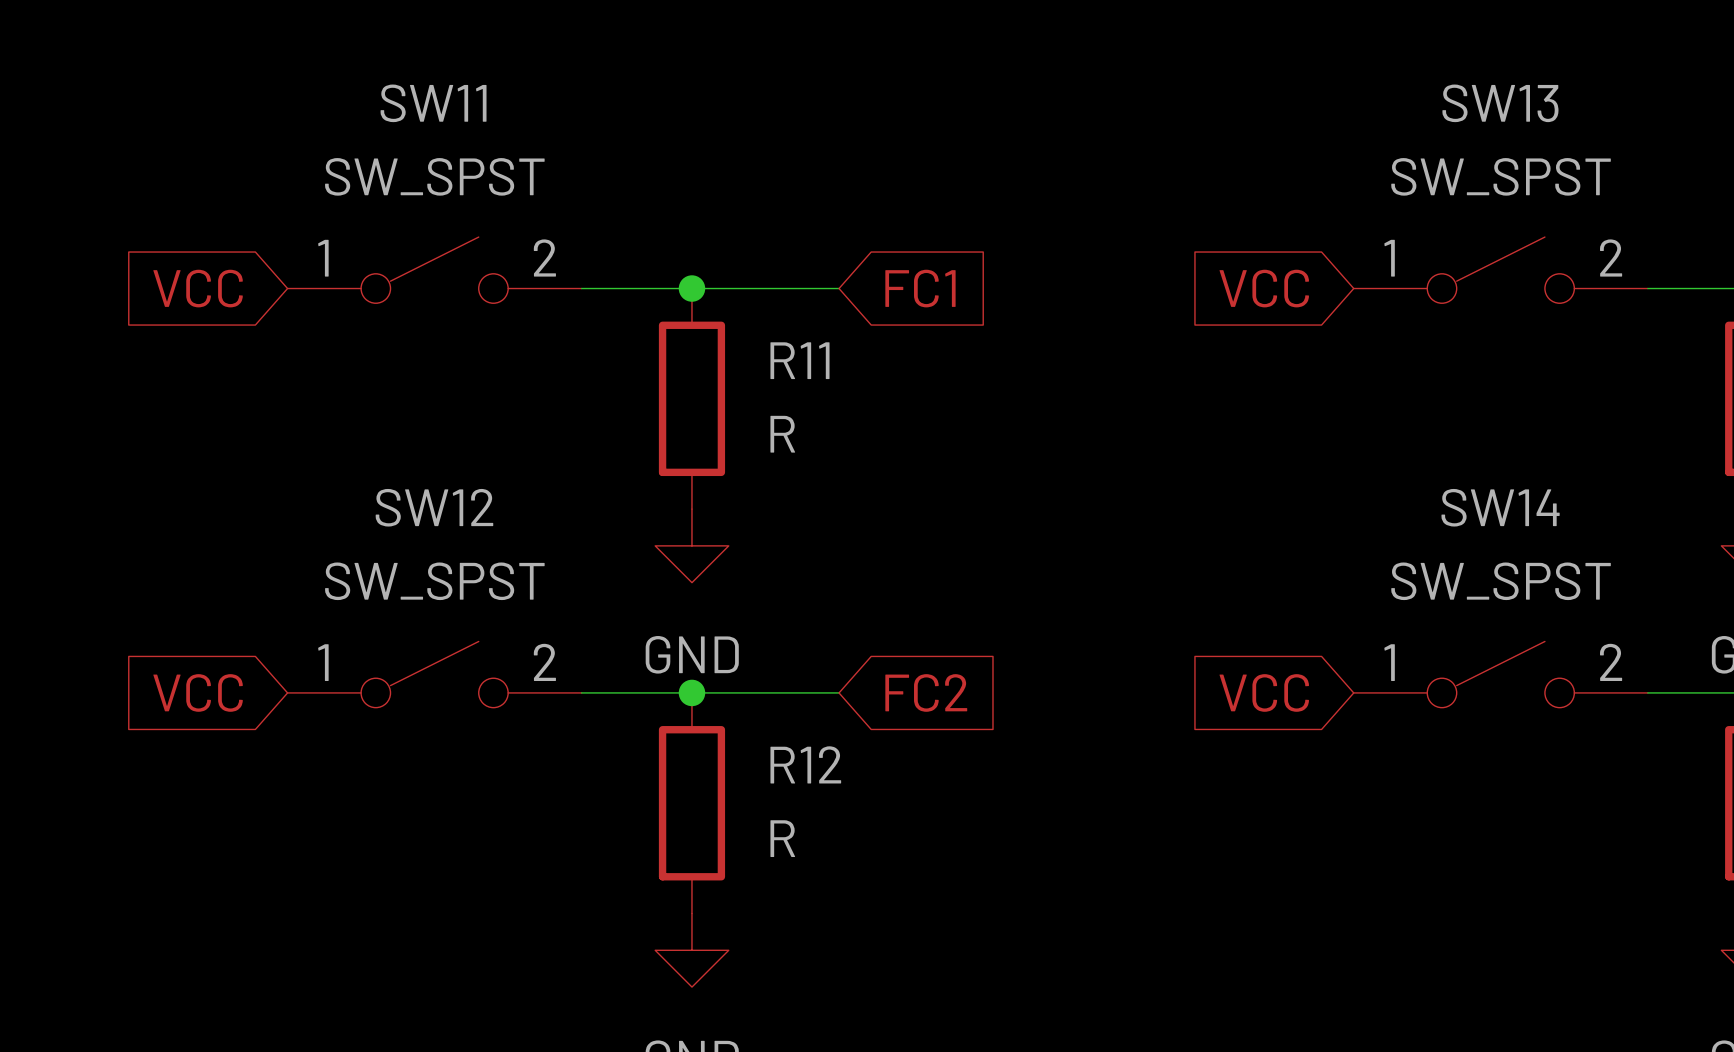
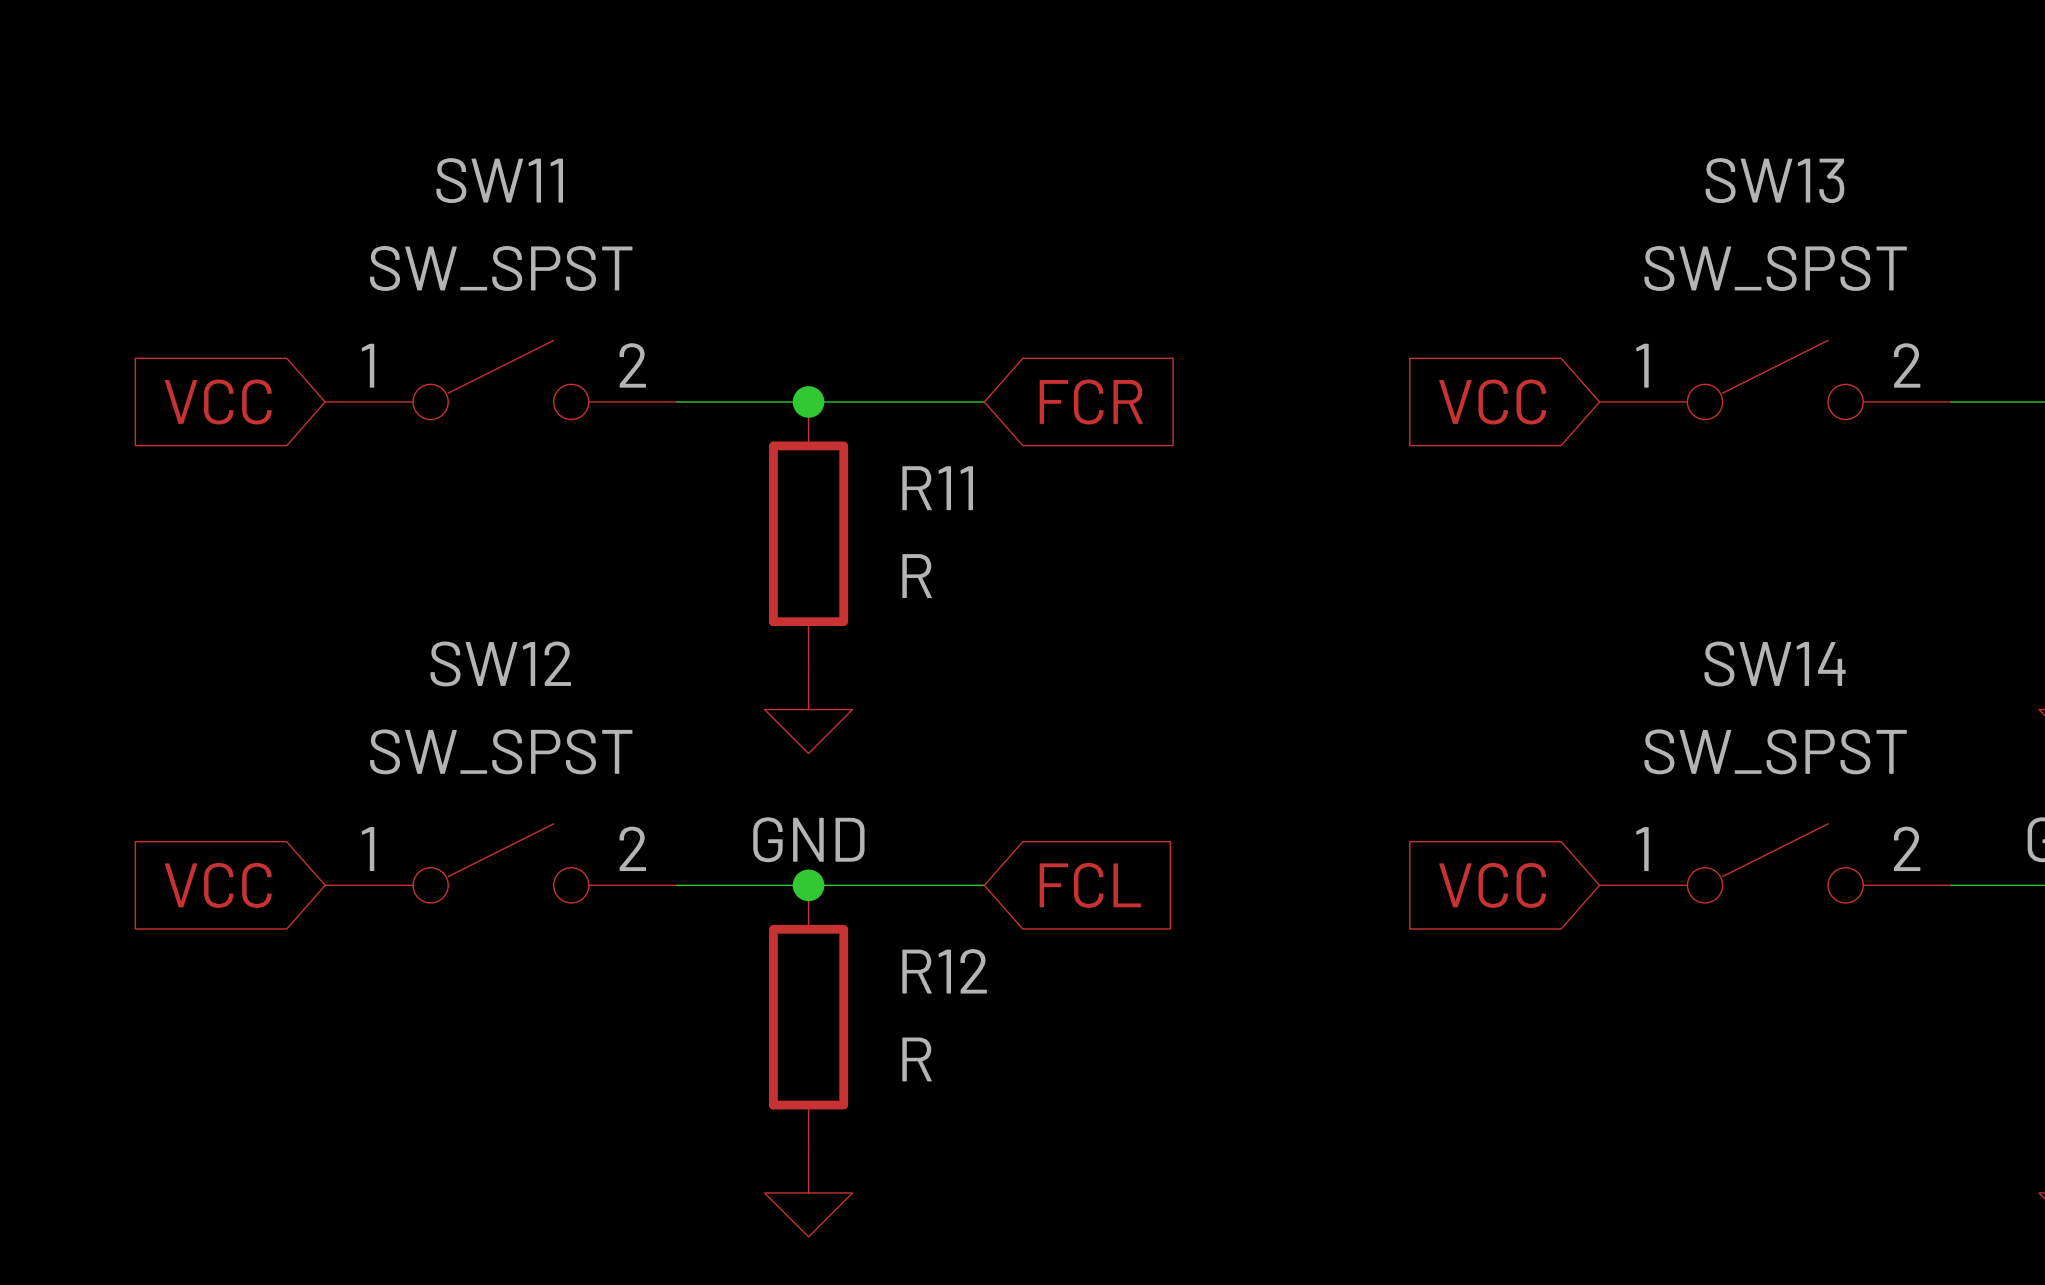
global label: FC1 (920, 288) -> FCR (1091, 401)
global label: FC2 (926, 692) -> FCL (1090, 885)

